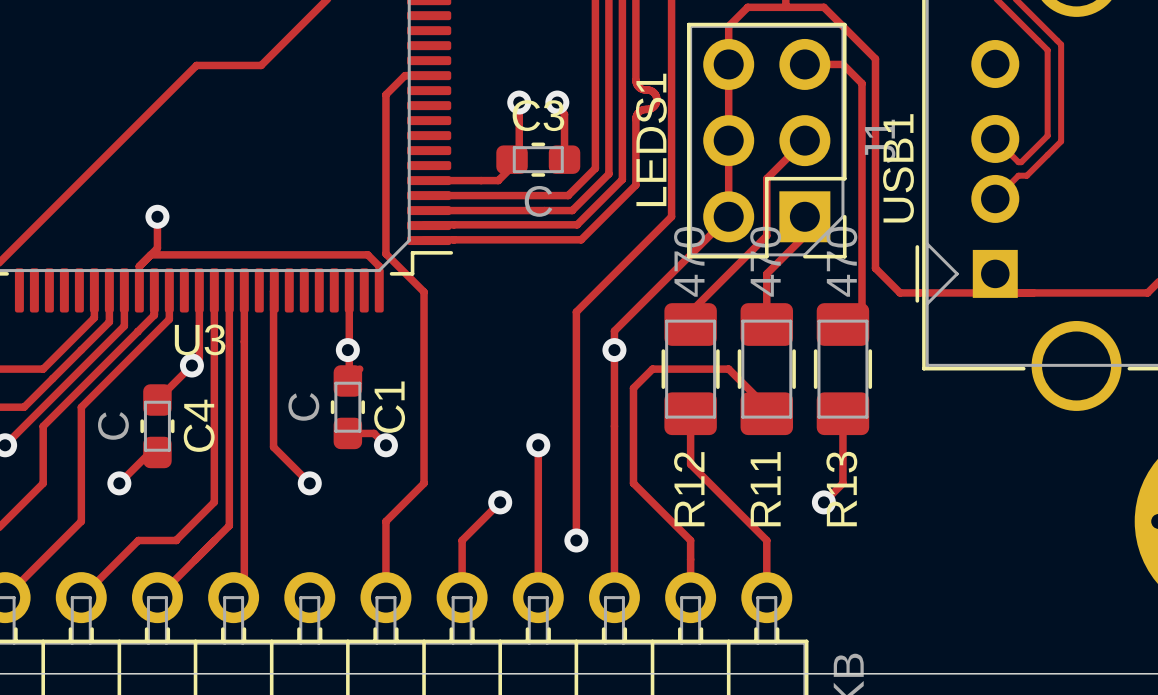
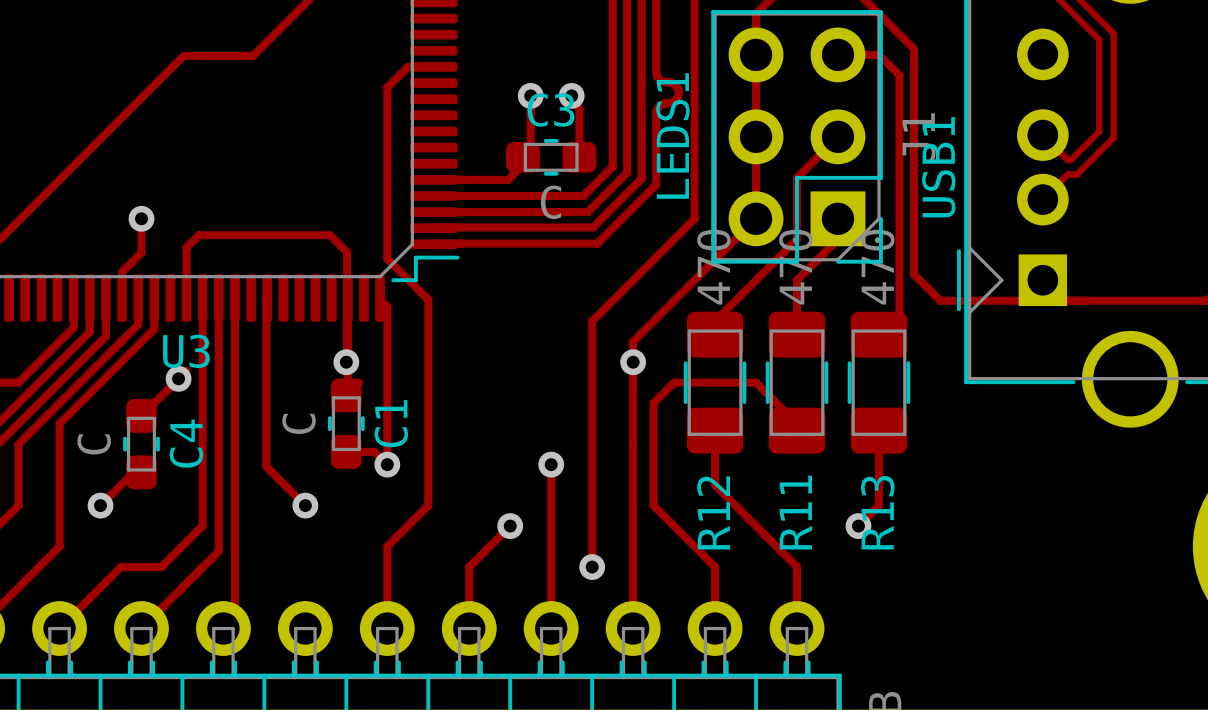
track: (150, 254) (367, 254) (379, 266) (379, 290) -> (387, 464) (387, 306) (380, 298)
track: (199, 290) (199, 358) -> (186, 298) (186, 247) (198, 235) (329, 235) (347, 252) (346, 362)

